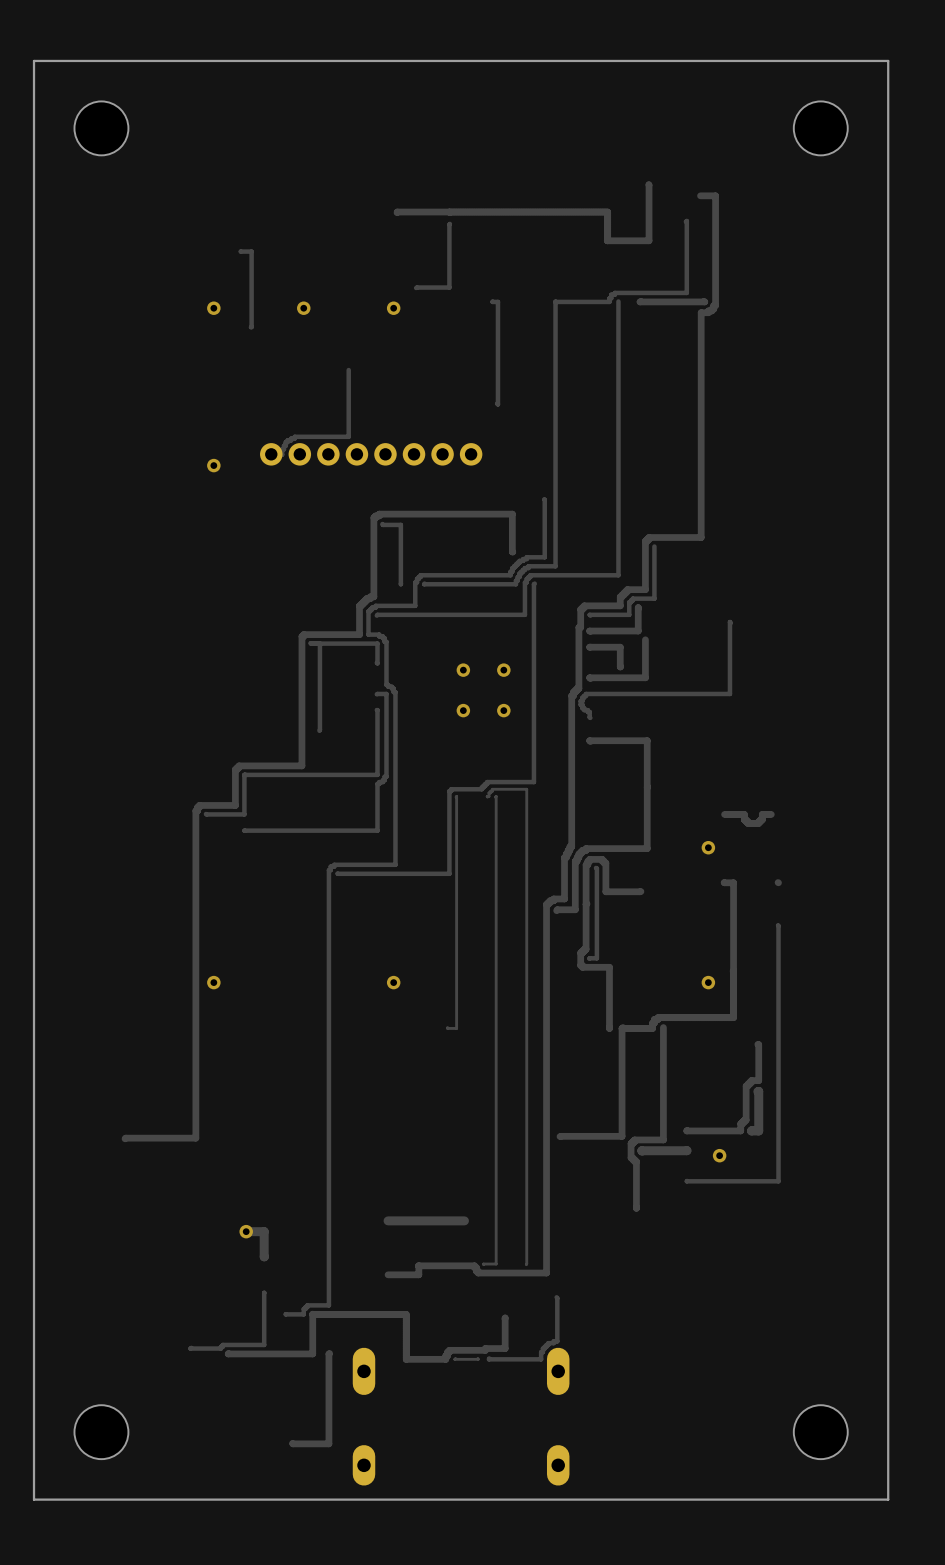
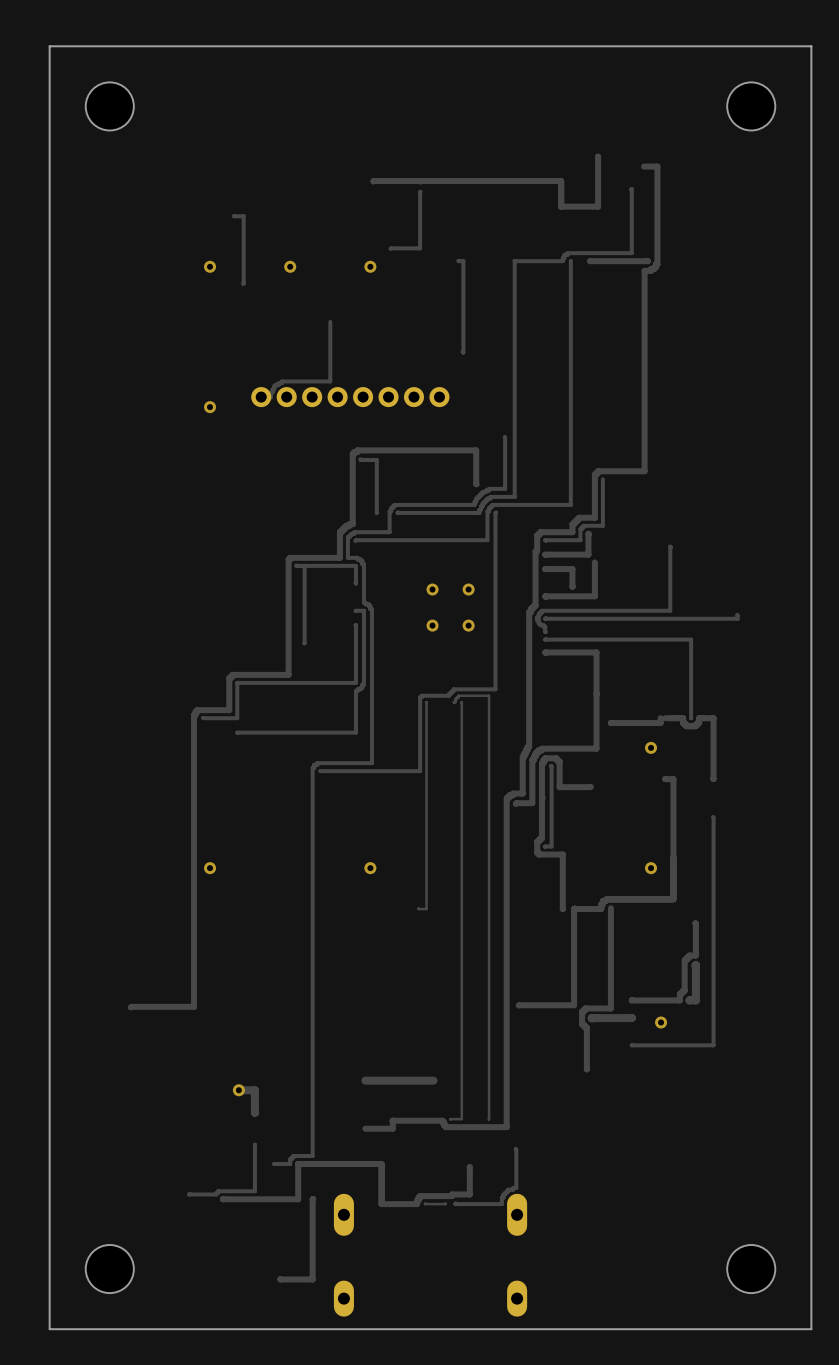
track: none -> (737, 614) (737, 618) (545, 618)
track: none -> (545, 639) (691, 639) (691, 718)
track: none -> (660, 718) (660, 723) (610, 723)
track: none -> (707, 718) (713, 718) (713, 779)

